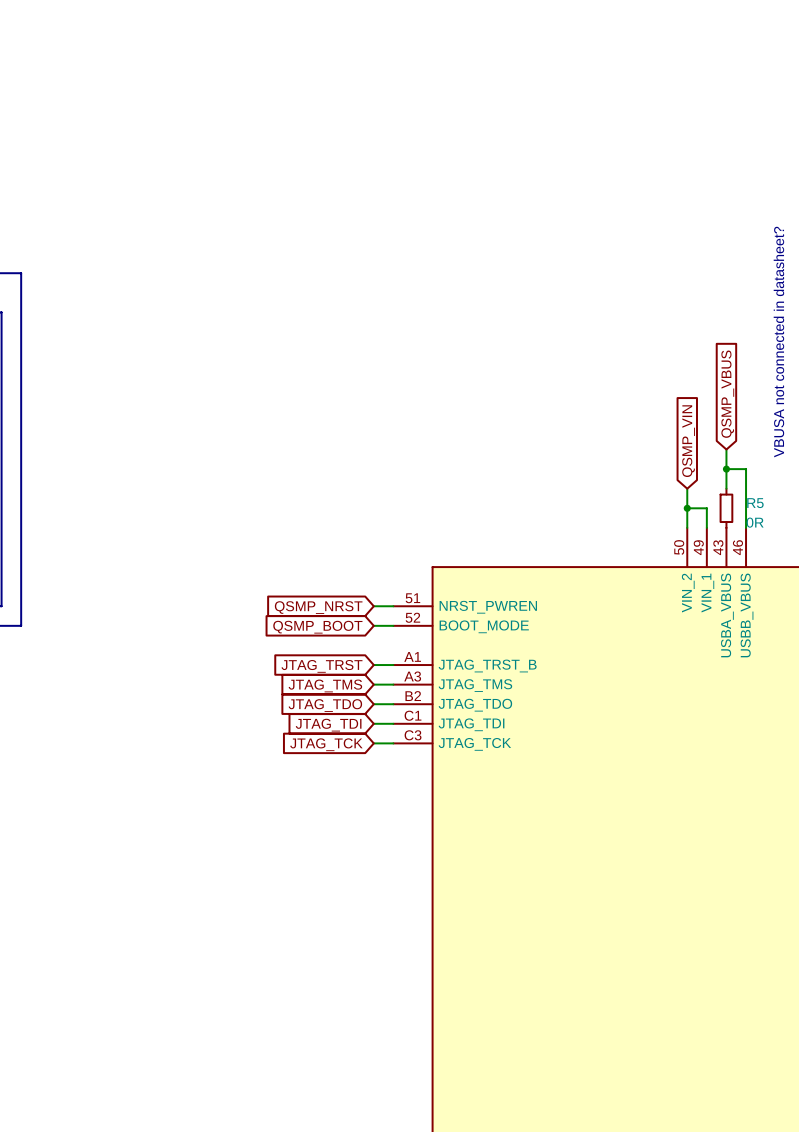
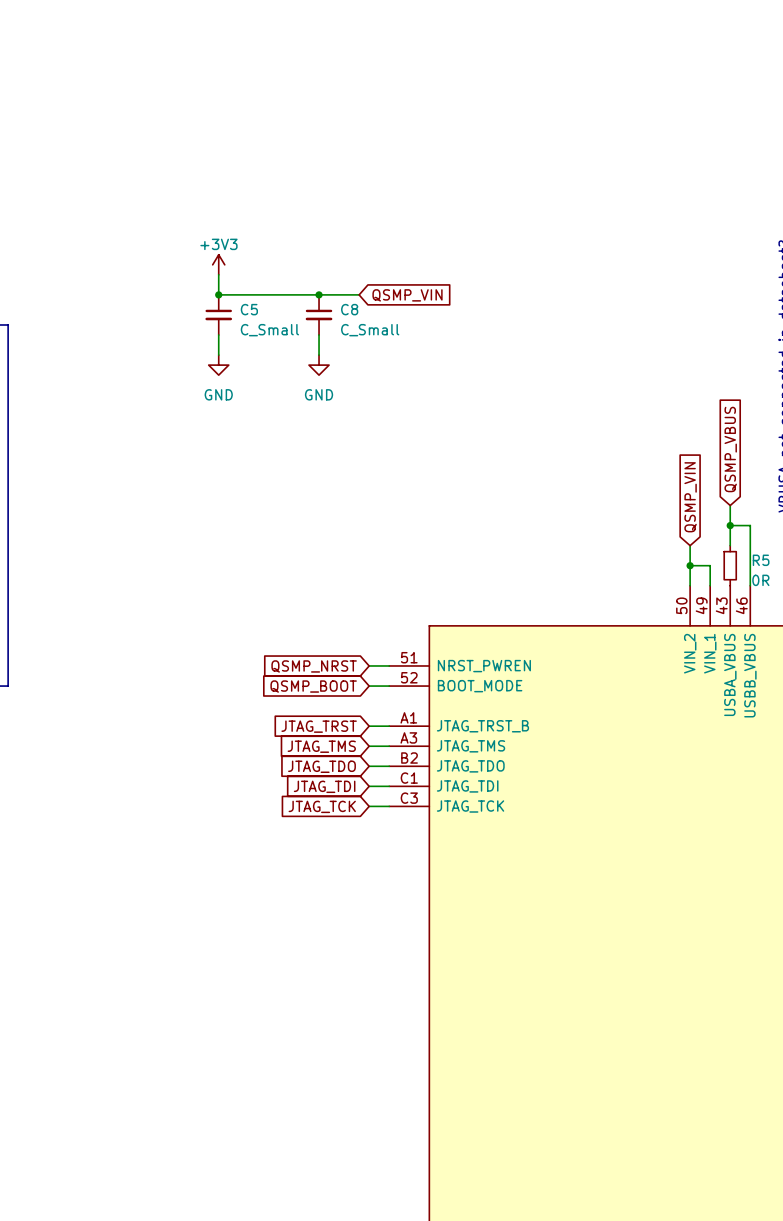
power symbol: none -> +3V3 (218, 264)
wire: none -> (218, 274) (218, 294) (359, 294)
junction: none -> (218, 294)
junction: none -> (319, 294)
global label: none -> QSMP_VIN (407, 295)
C5: none -> C_Small (218, 314)
C8: none -> C_Small (319, 314)
wire: none -> (218, 335) (218, 355)
wire: none -> (319, 335) (319, 355)
power symbol: none -> GND (218, 365)
power symbol: none -> GND (319, 365)

